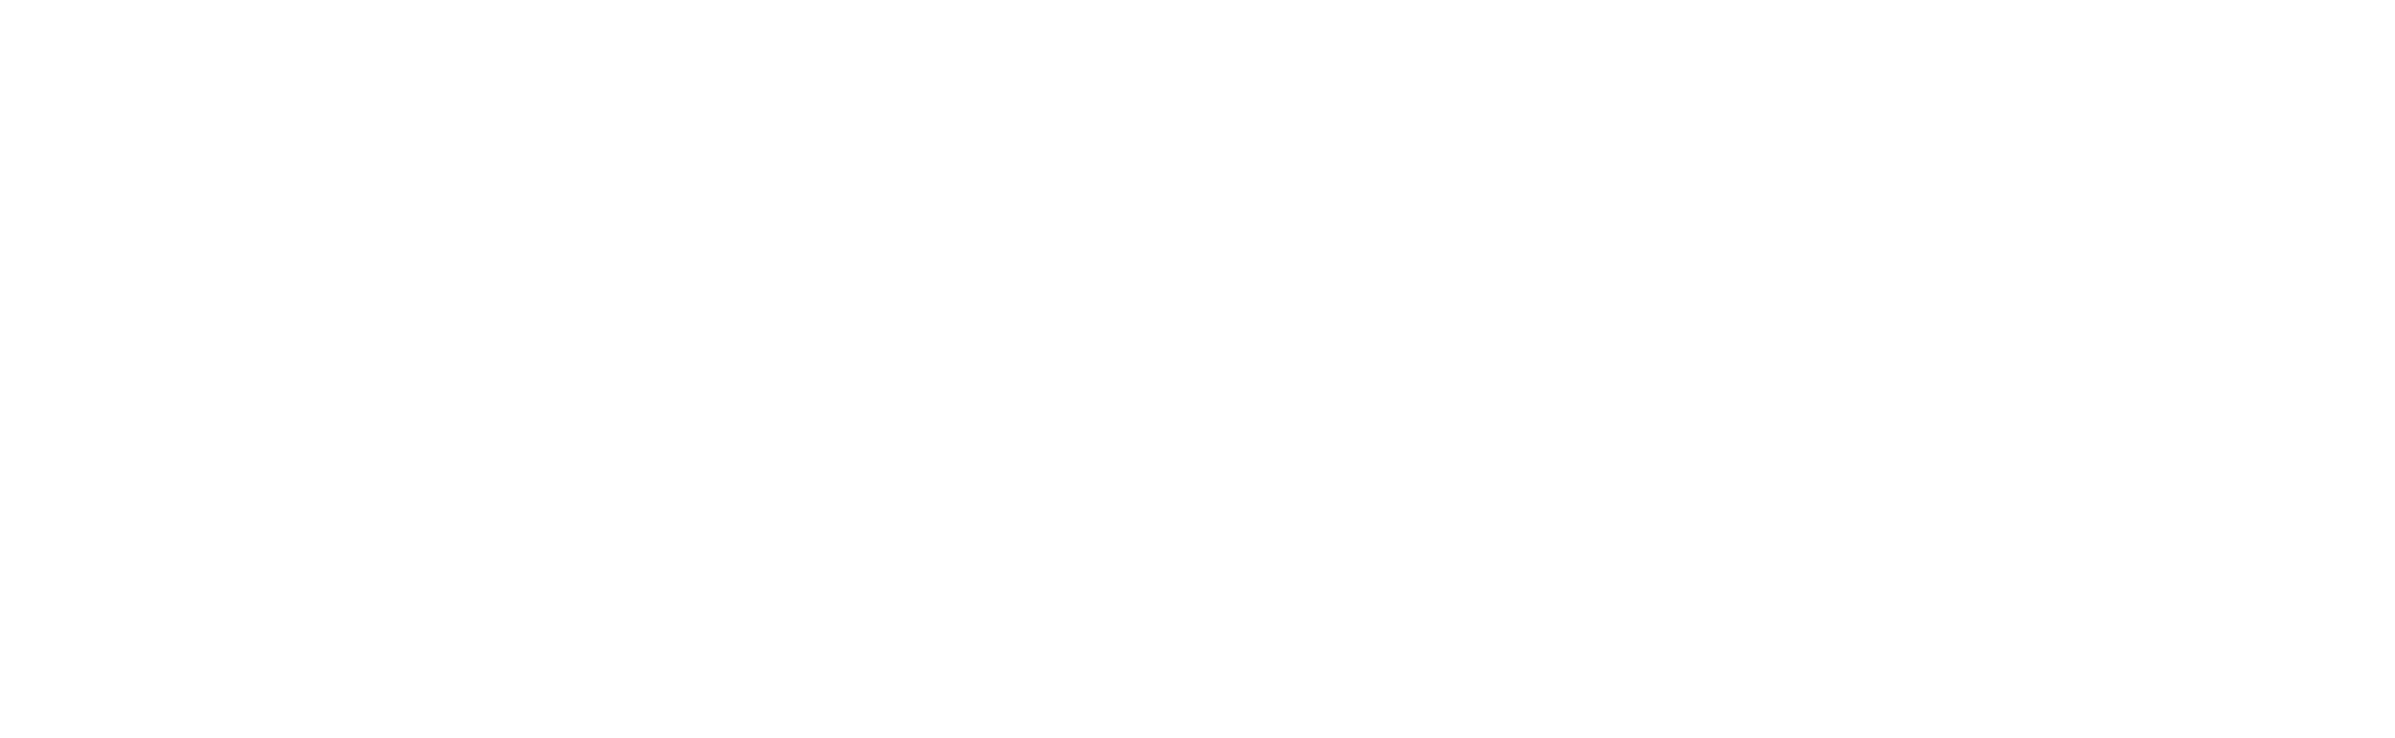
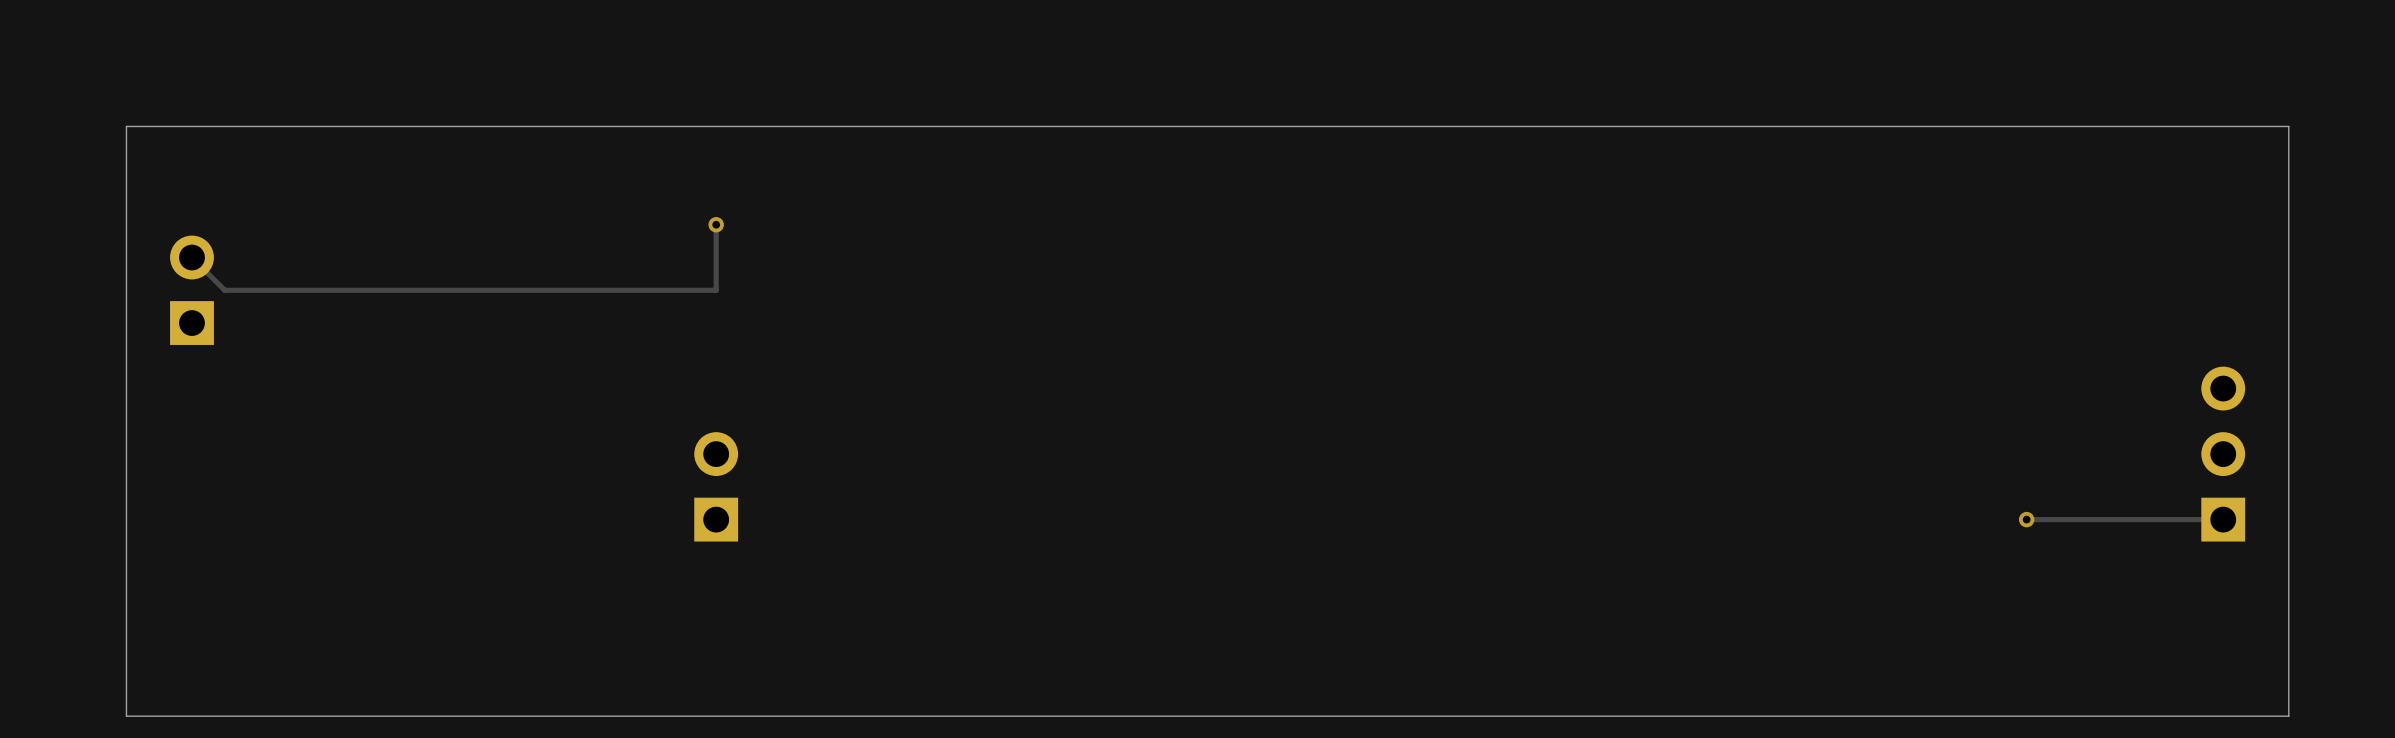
board edge: none -> (2288, 126) (126, 126) (126, 716) (2288, 716) (2288, 126)
track: none -> (716, 224) (716, 290) (224, 290) (191, 257)
via: none -> (716, 224)
part: none -> (191, 290)
part: none -> (2223, 454)
part: none -> (716, 486)
via: none -> (2026, 519)
track: none -> (2223, 519) (2026, 519)

